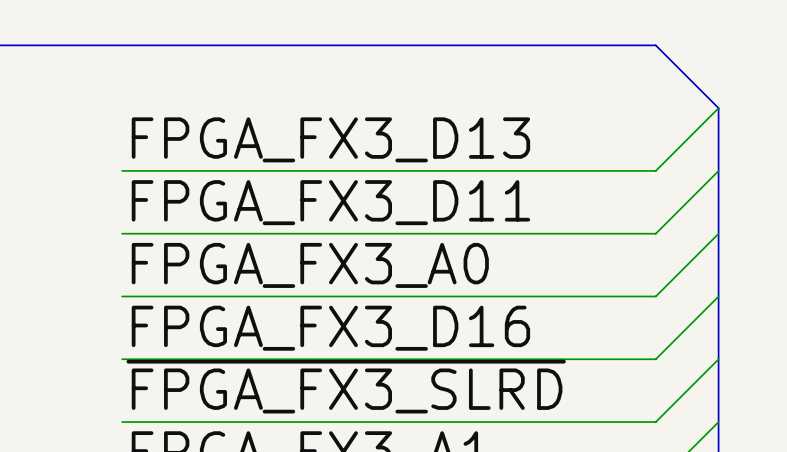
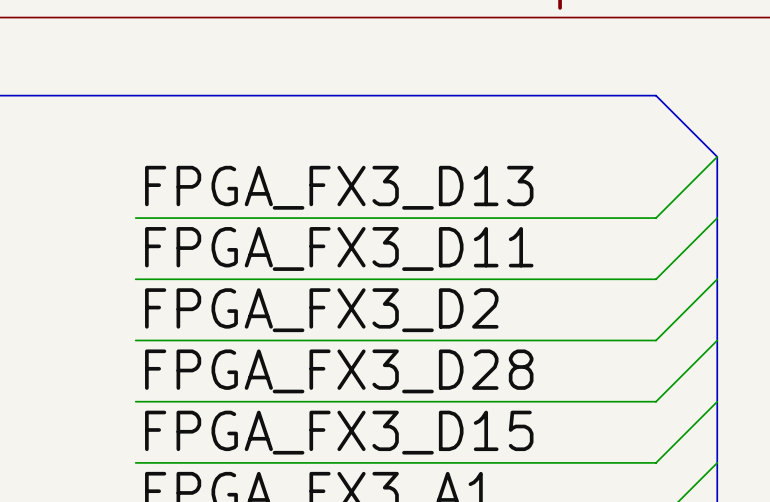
label: FPGA_FX3_A0 (310, 265) -> FPGA_FX3_D2 (321, 310)
label: FPGA_FX3_D16 (330, 328) -> FPGA_FX3_D28 (339, 371)
label: ~{FPGA_FX3_SLRD} (346, 386) -> FPGA_FX3_D15 (339, 432)

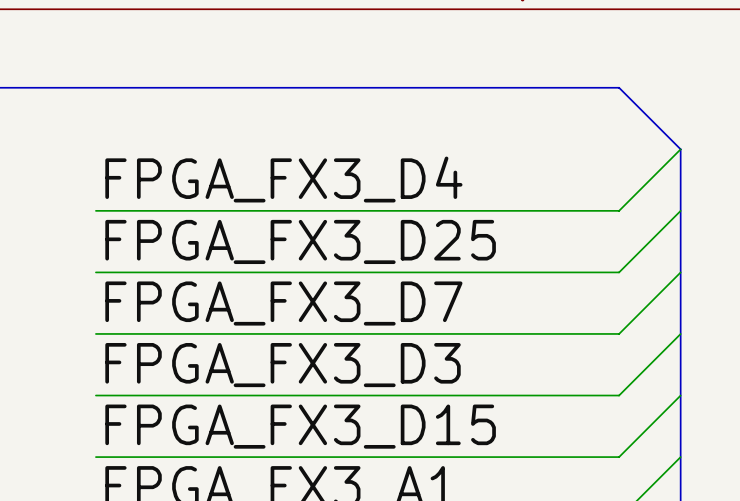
label: FPGA_FX3_D13 (339, 187) -> FPGA_FX3_D4 (283, 179)
label: FPGA_FX3_D11 (339, 248) -> FPGA_FX3_D25 (300, 241)
label: FPGA_FX3_D2 (321, 310) -> FPGA_FX3_D7 (283, 303)
label: FPGA_FX3_D28 (339, 371) -> FPGA_FX3_D3 (283, 365)

